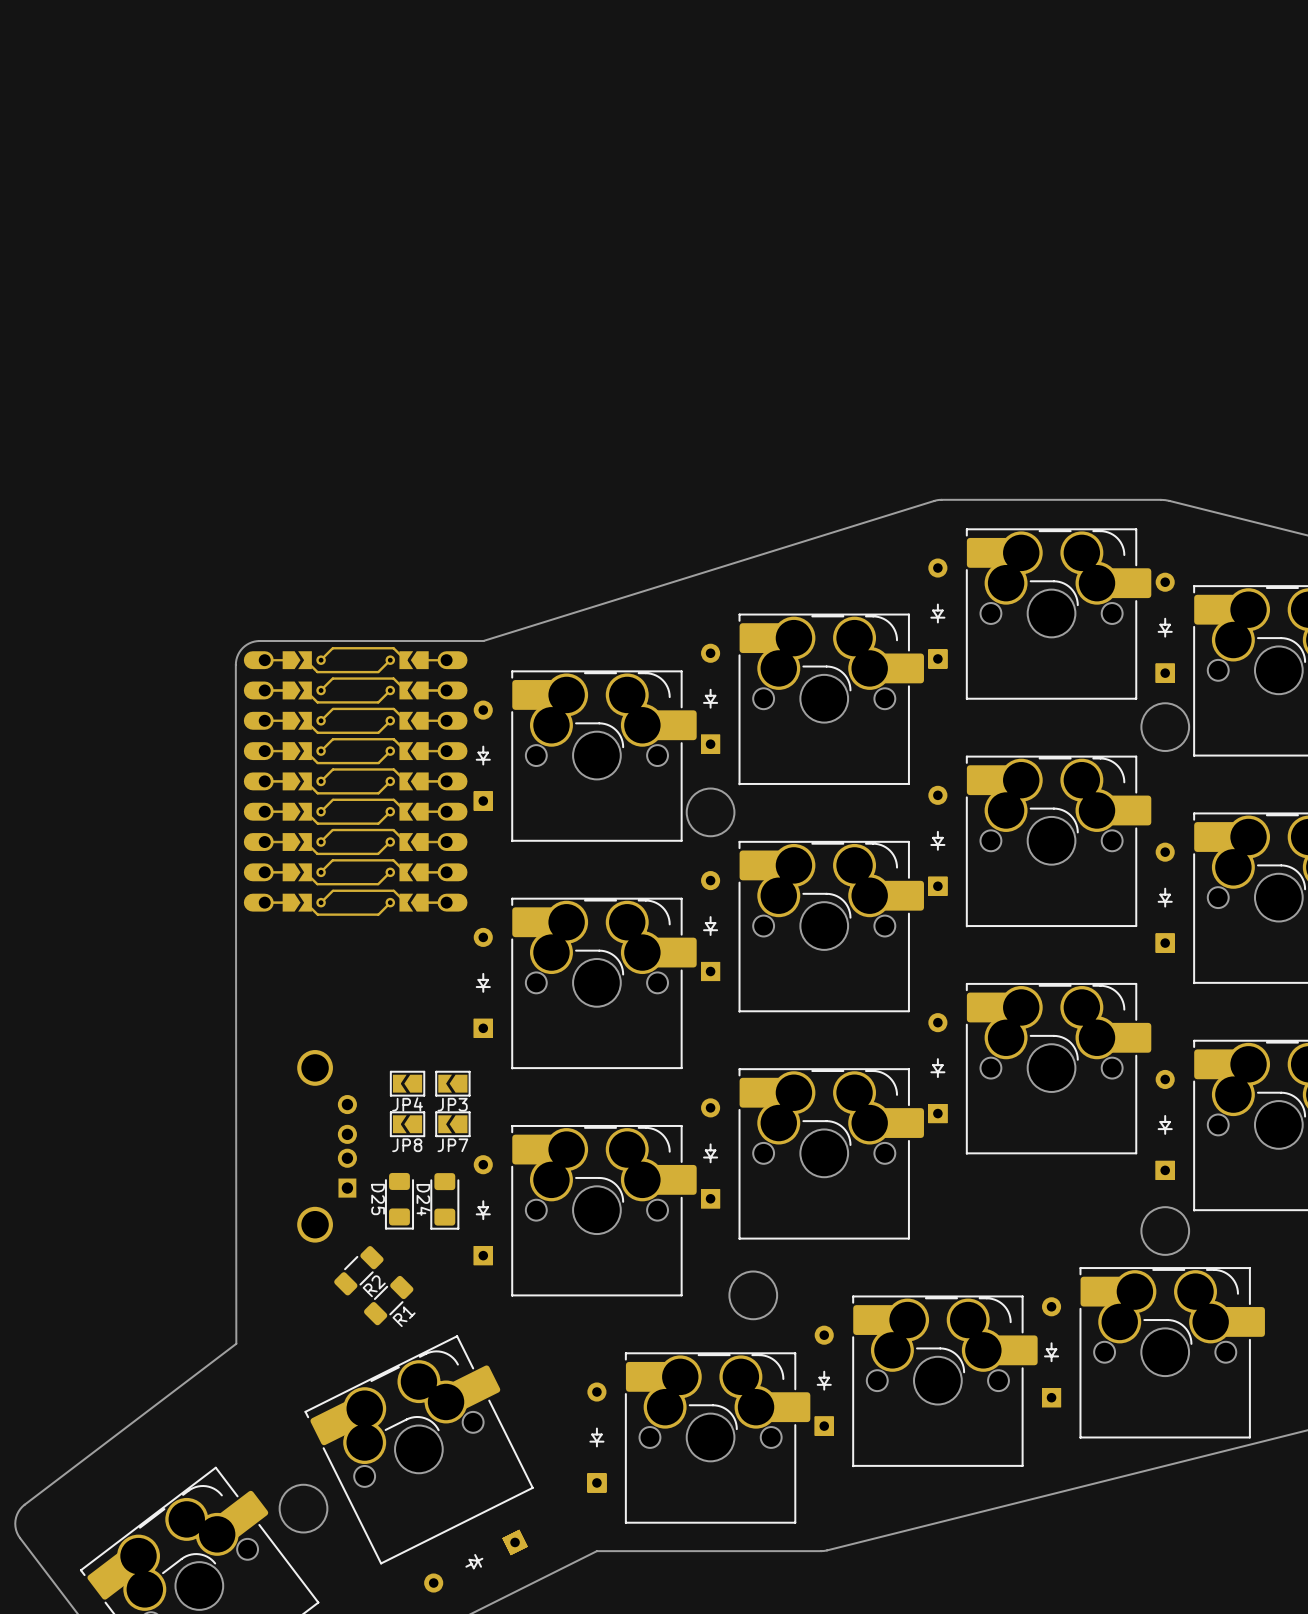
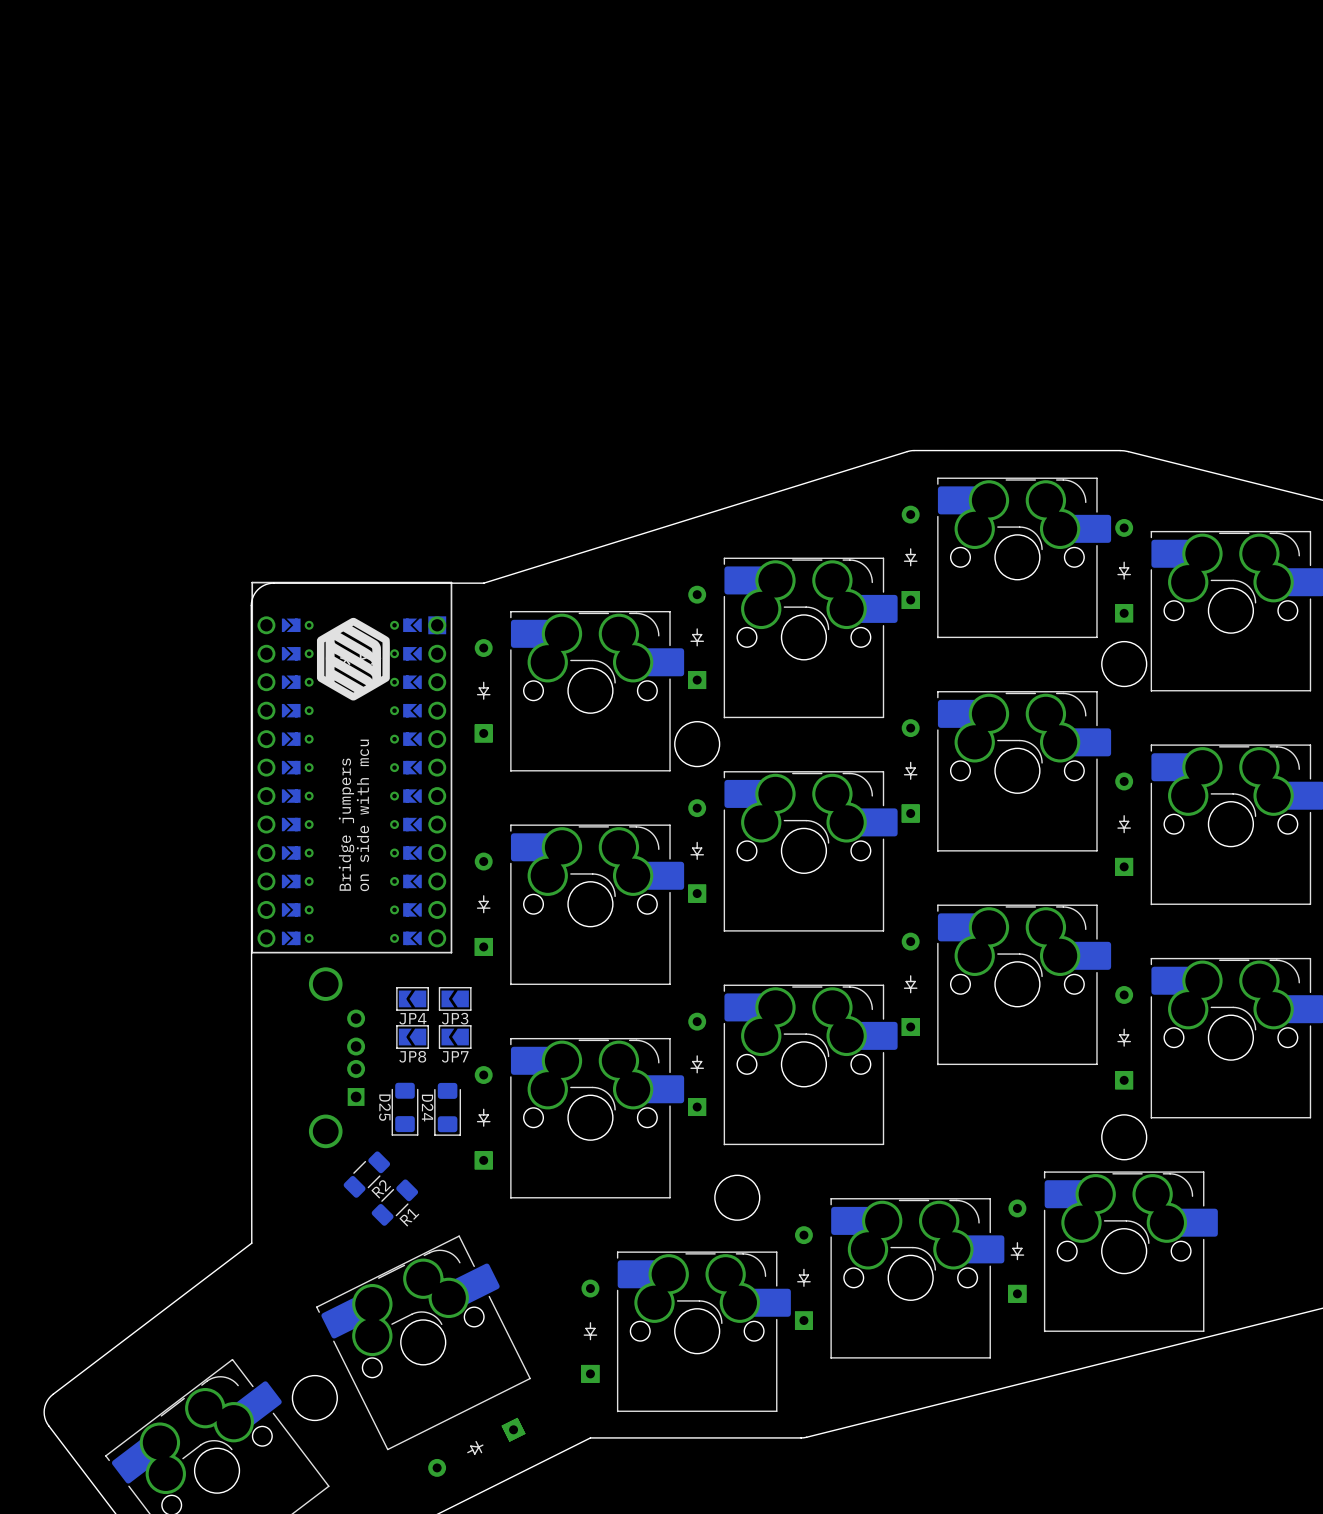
part: none -> (353, 659)
part: (355, 781) -> none
part: none -> (351, 767)
text: none -> on side with mcu (362, 815)
text: none -> Bridge jumpers (346, 824)

